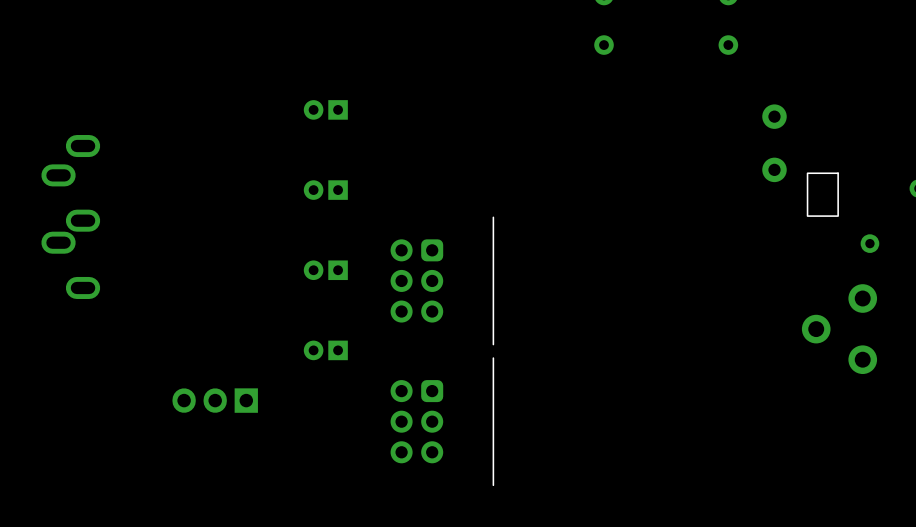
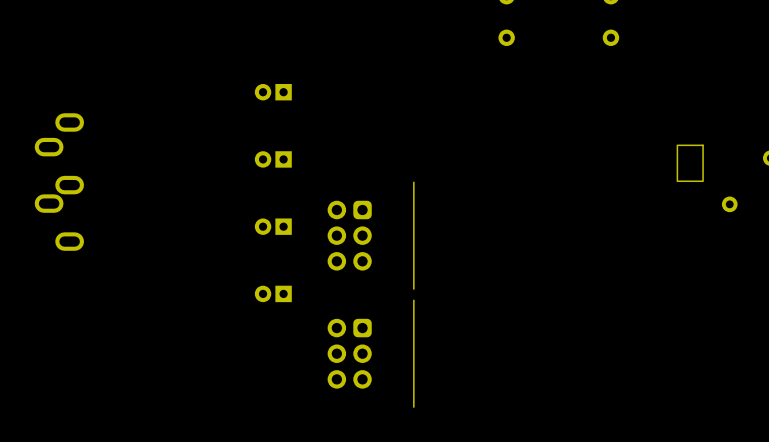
part: (774, 116) -> none
part: (774, 169) -> none
part: (839, 329) -> none
part: (215, 400) -> none

